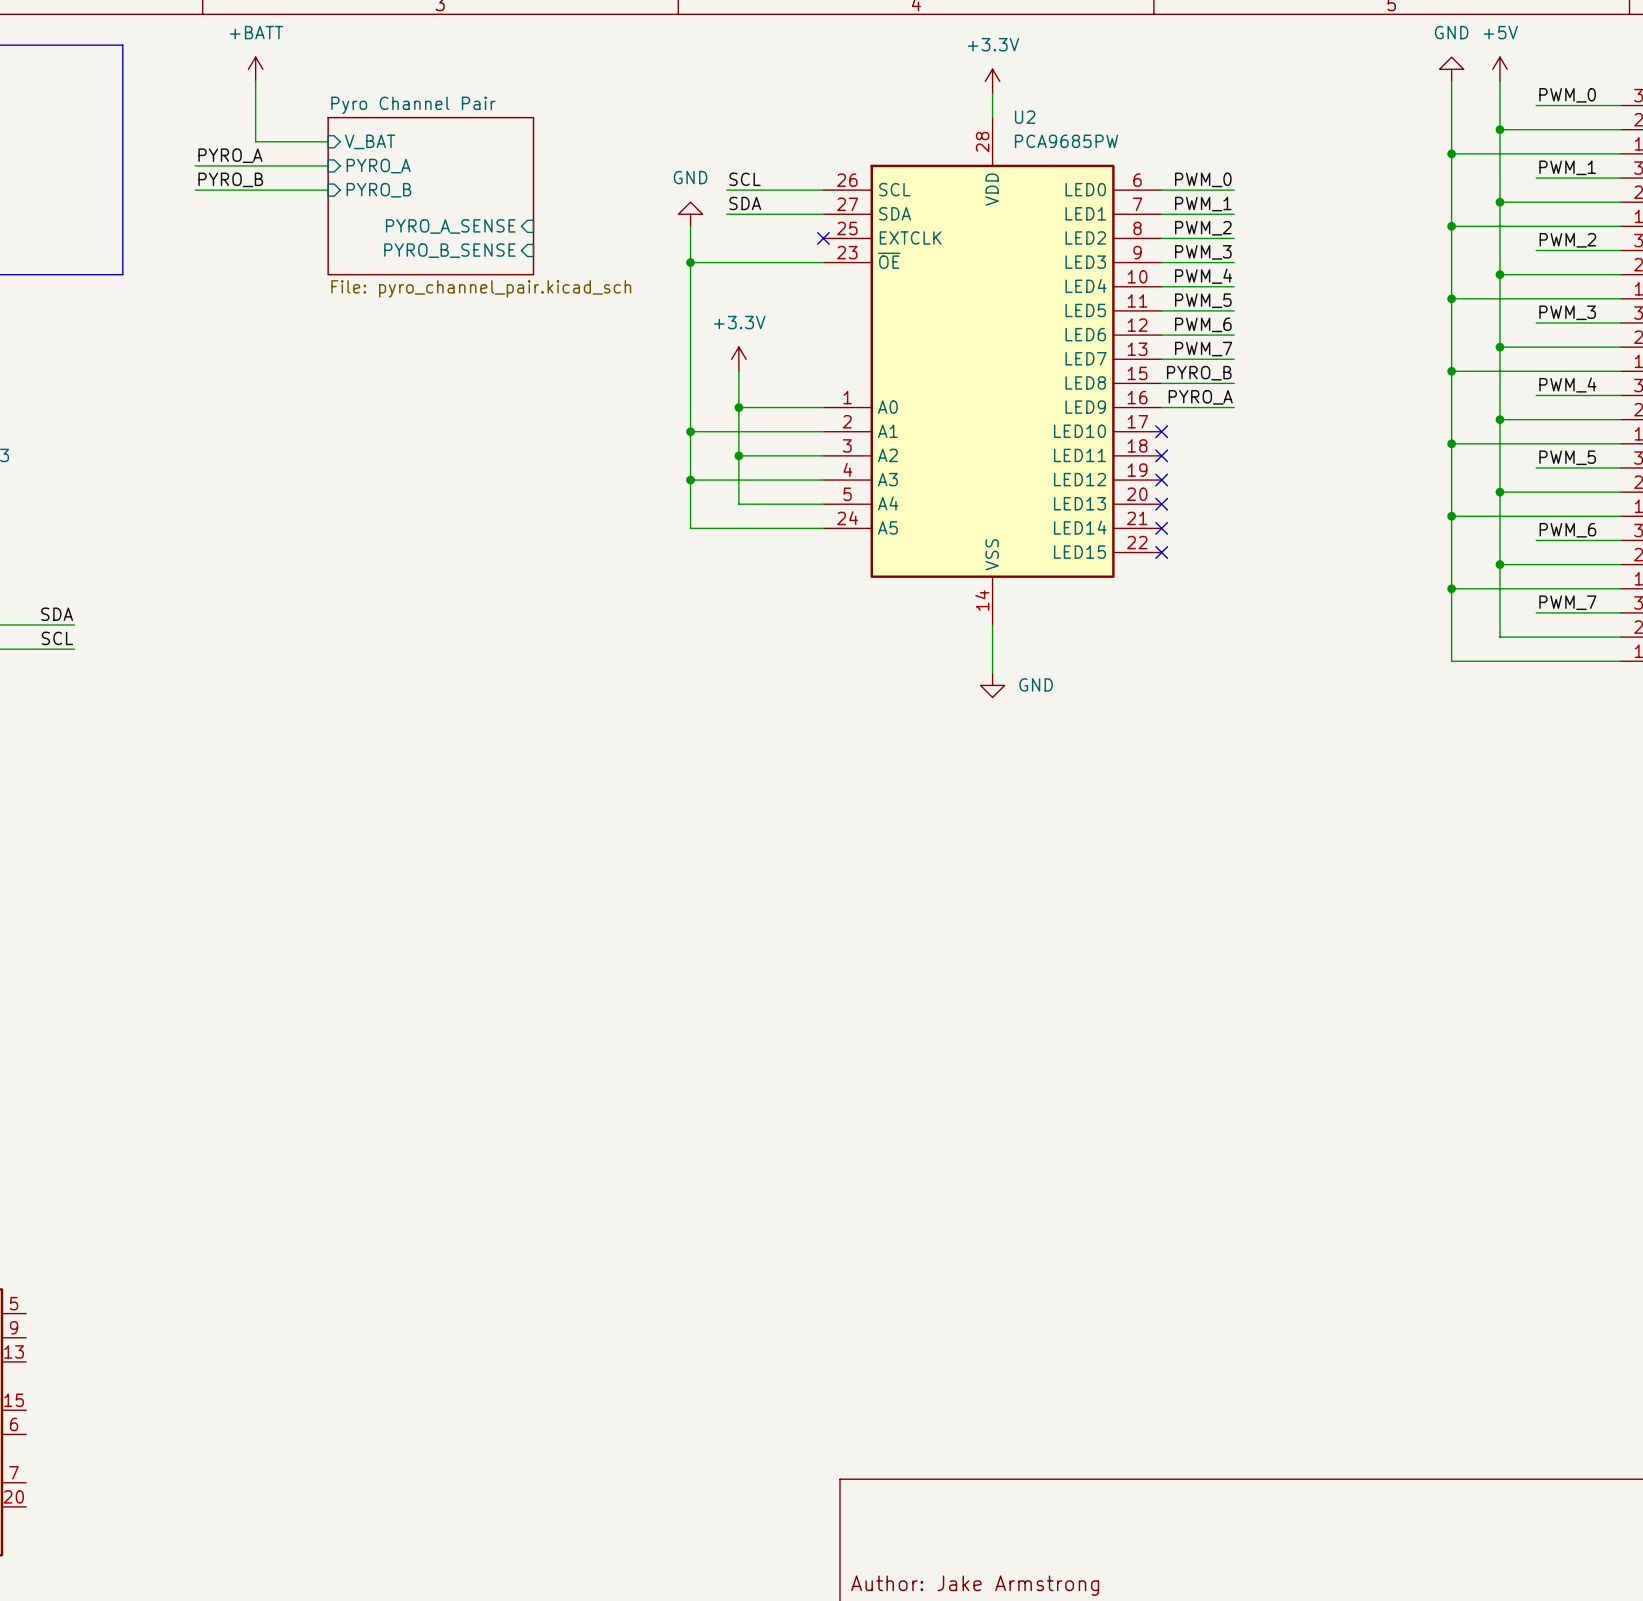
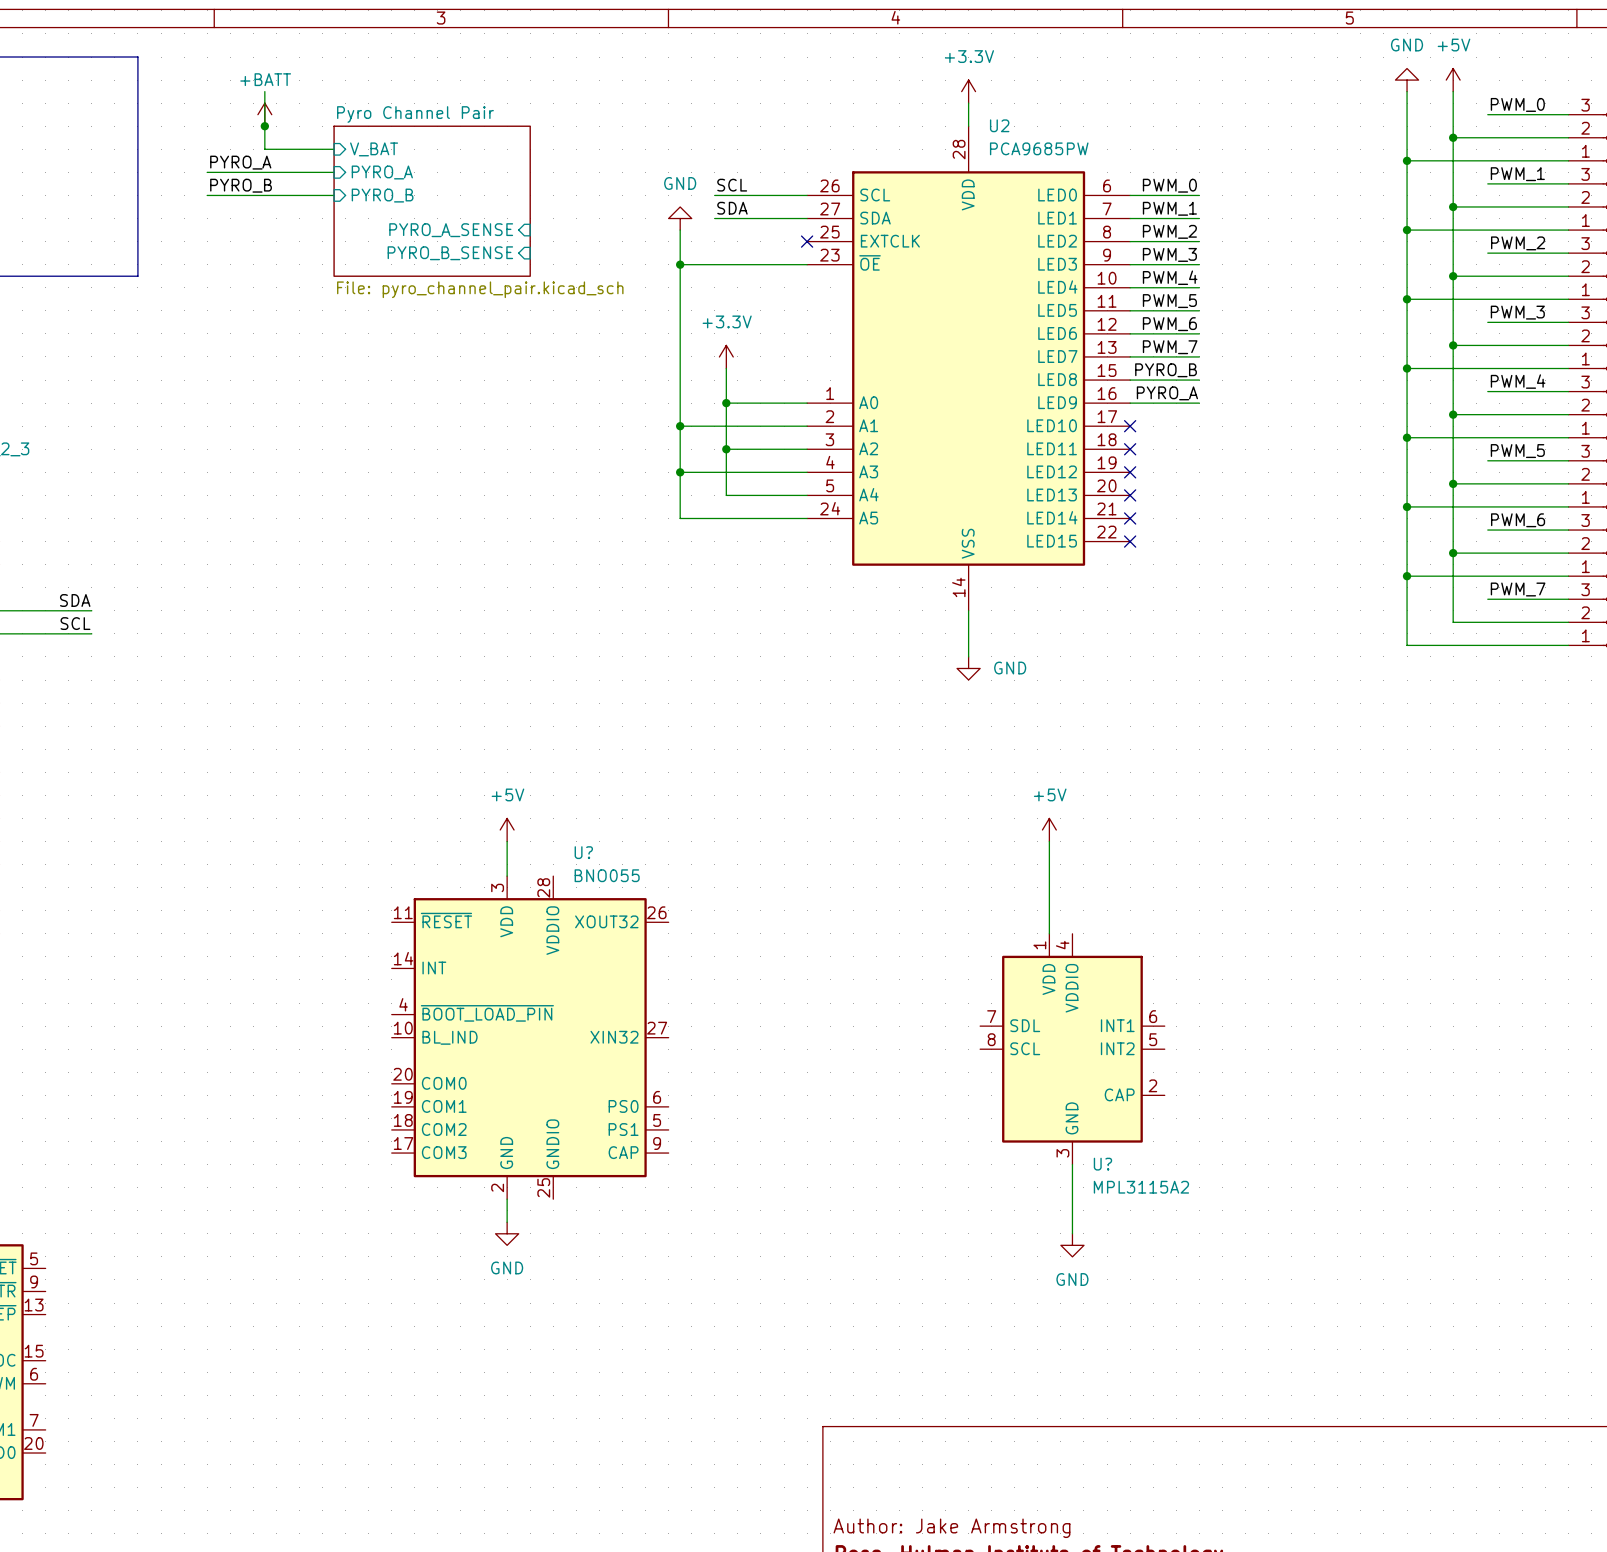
power symbol position: +BATT (255, 69) -> +BATT (264, 114)
junction: none -> (264, 126)
power symbol: none -> +5V (507, 829)
power symbol: none -> +5V (1049, 829)
wire: none -> (507, 841) (507, 876)
wire: none -> (1049, 841) (1049, 933)
U?: none -> BNO055 (530, 1037)
U?: none -> MPL3115A2 (1072, 1049)
wire: none -> (1072, 1164) (1072, 1233)
wire: none -> (507, 1199) (507, 1222)
power symbol: none -> GND (507, 1233)
power symbol: none -> GND (1072, 1245)

